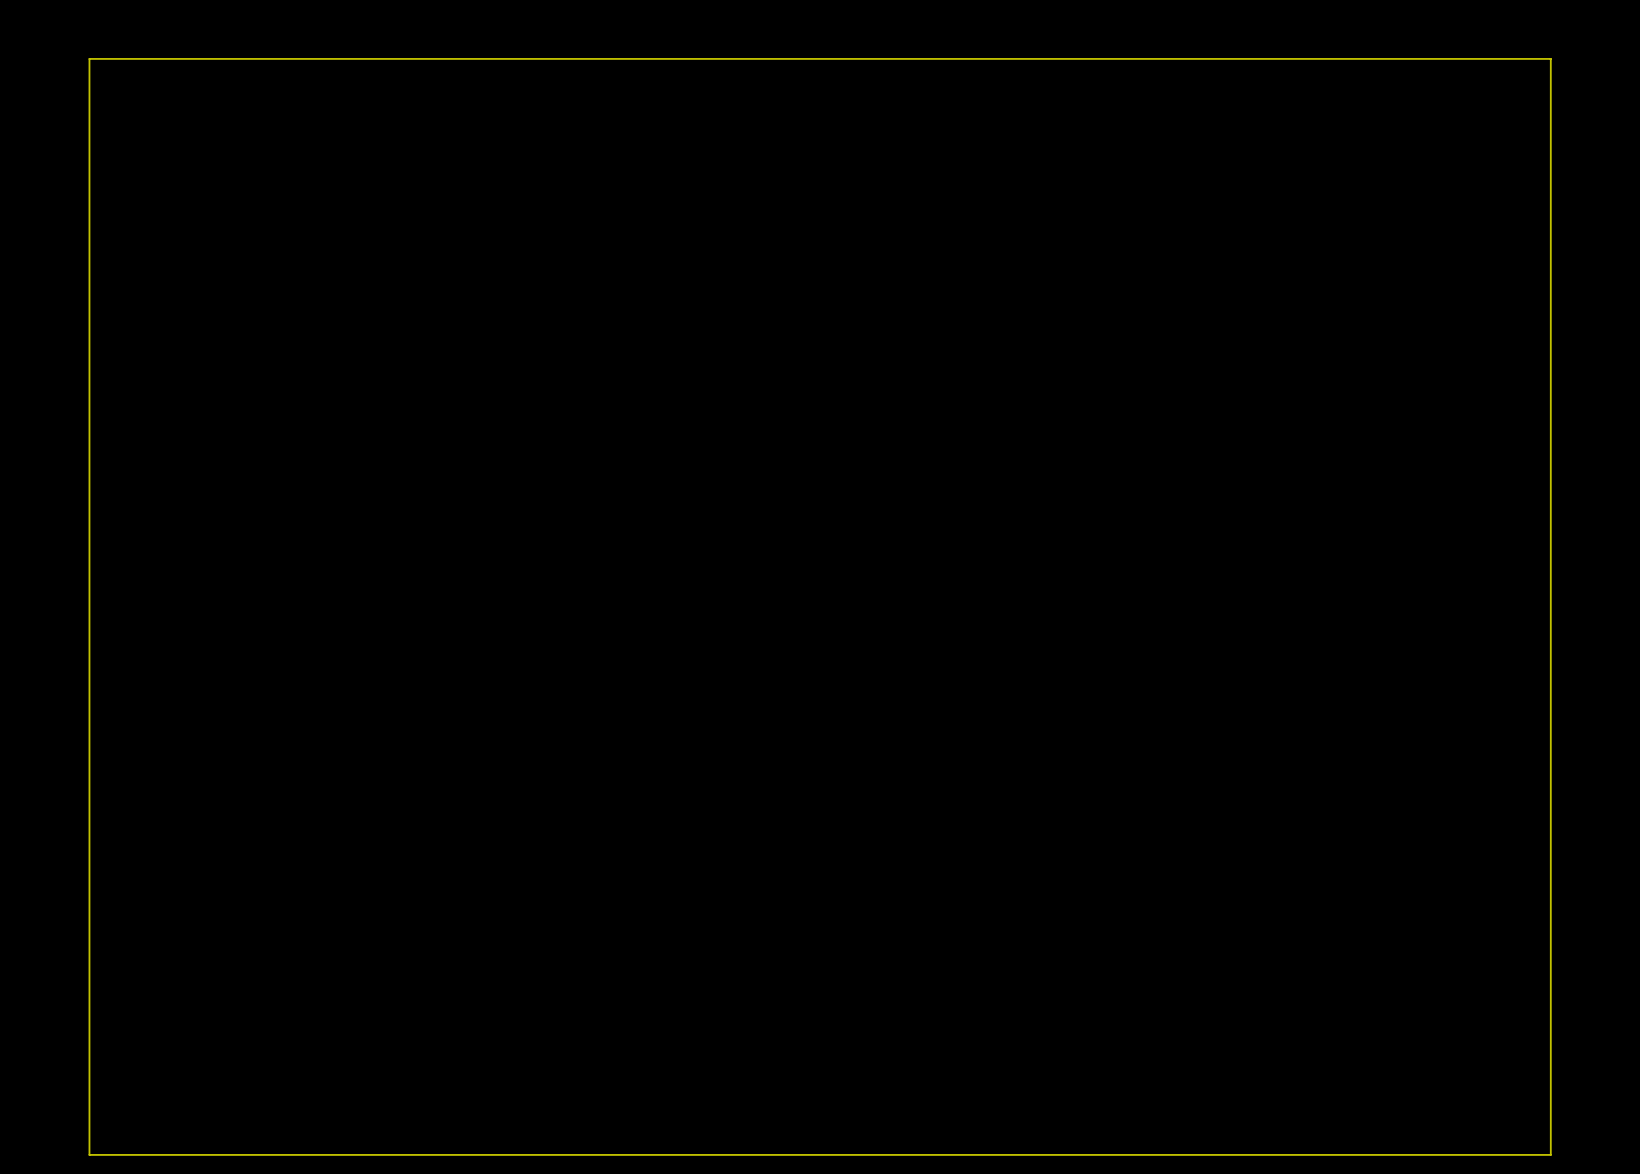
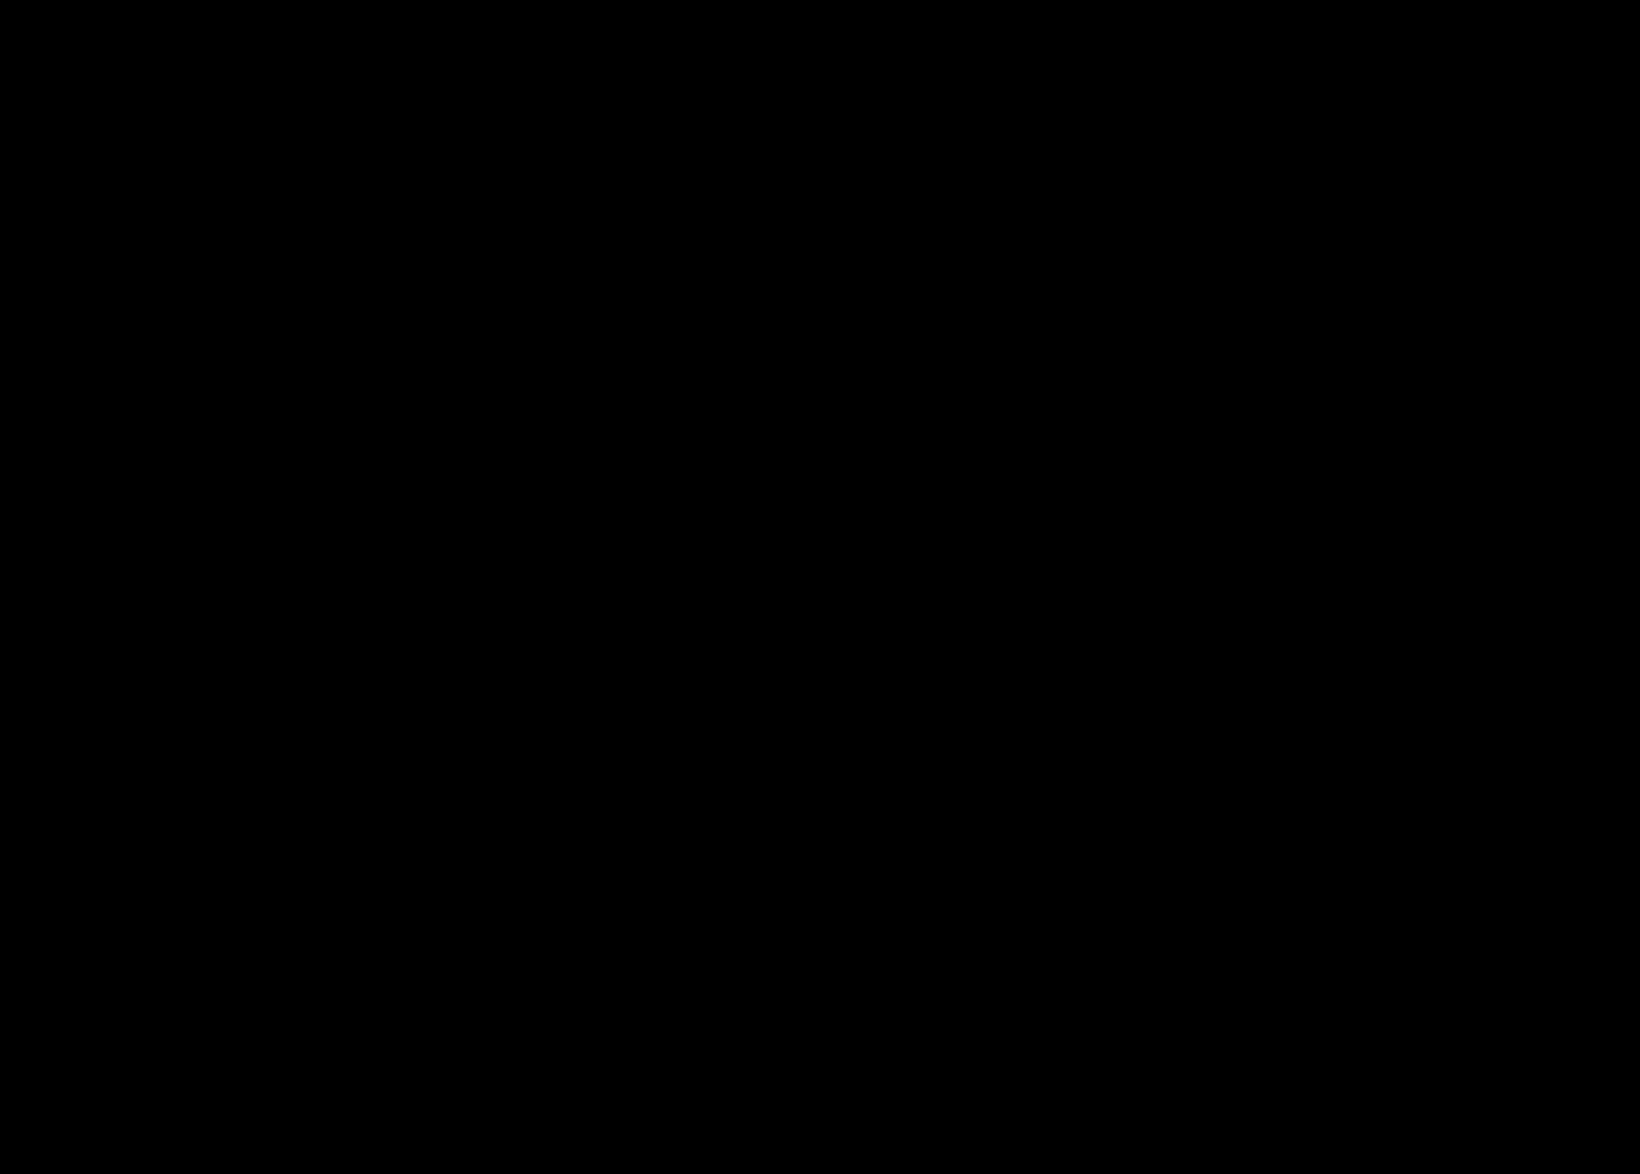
board edge: (89, 58) (1550, 58) (1550, 1154) (89, 1154) (89, 58) -> none

